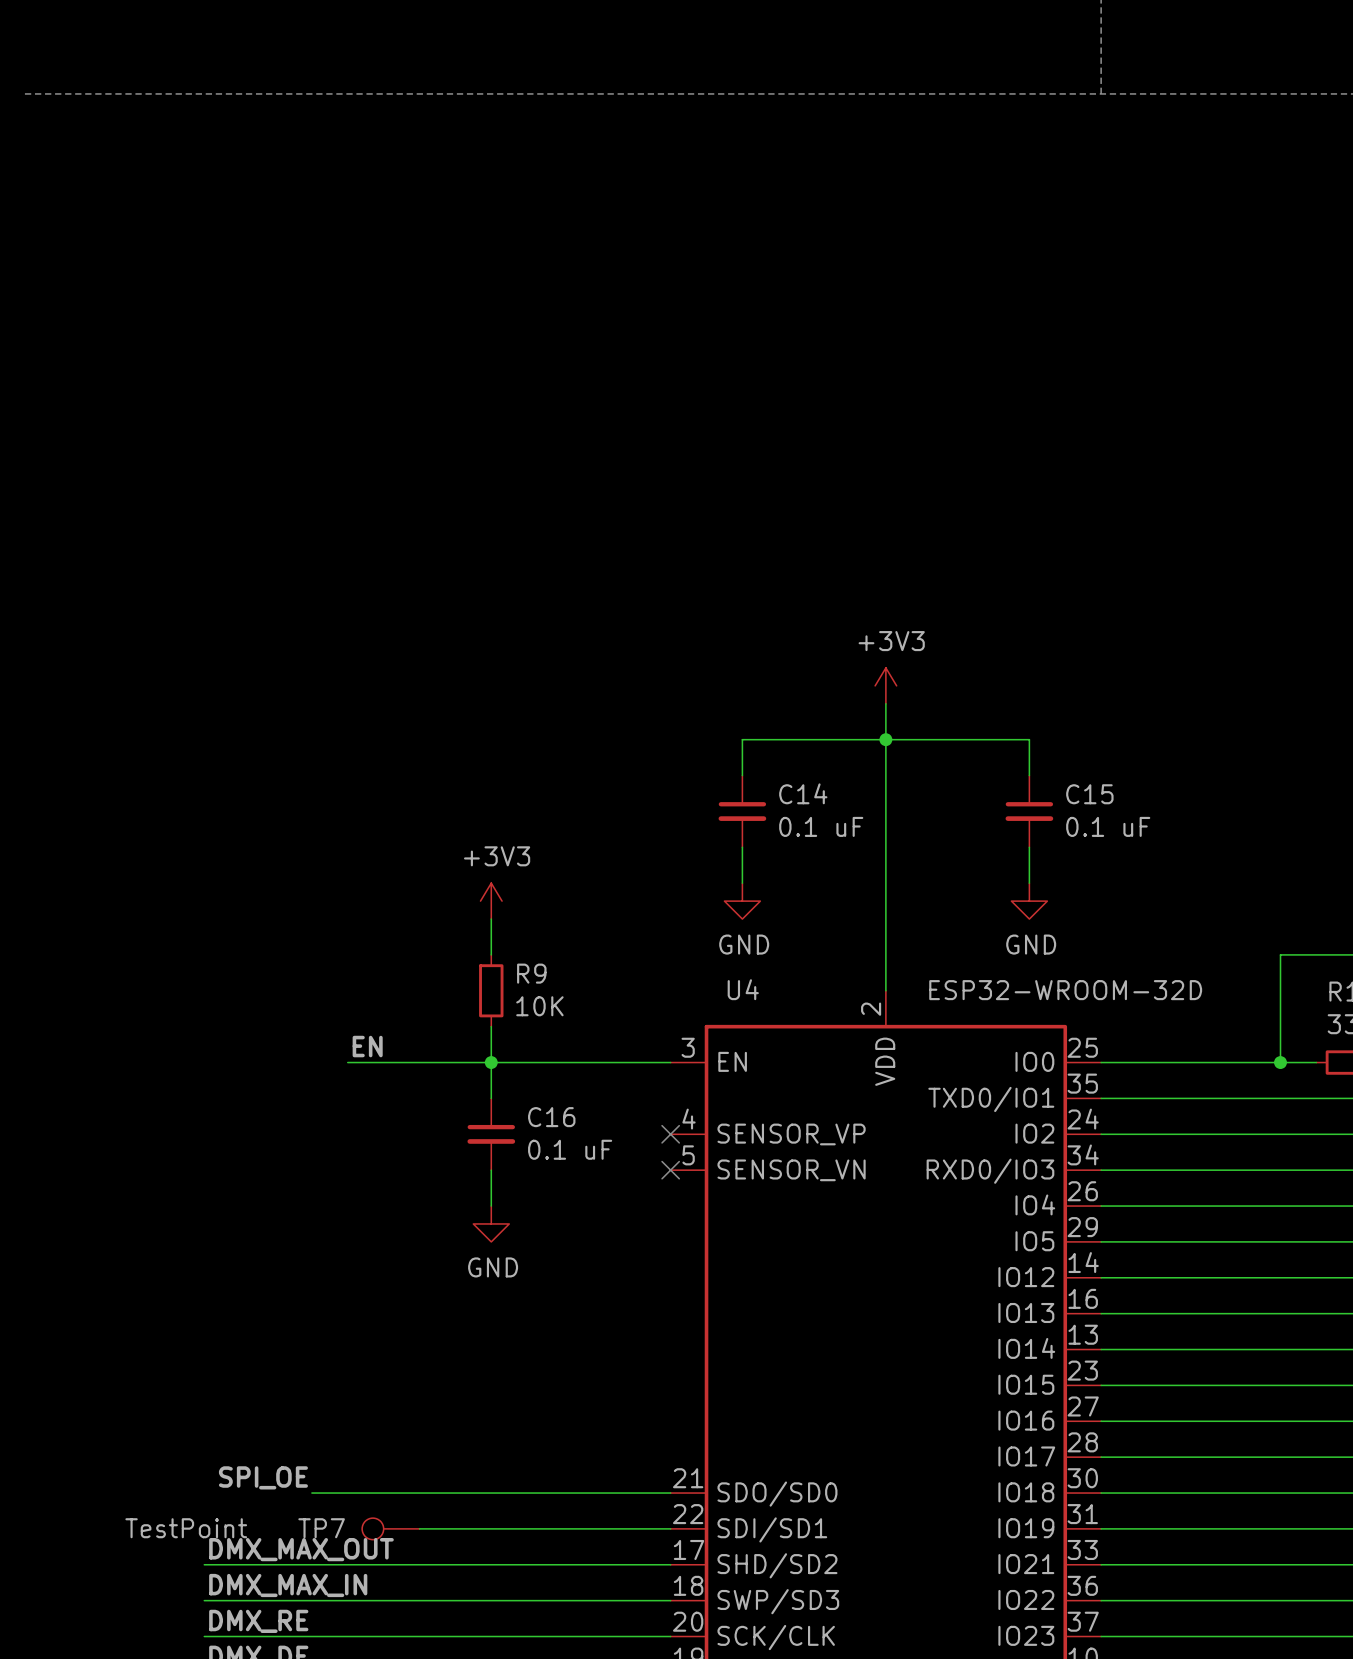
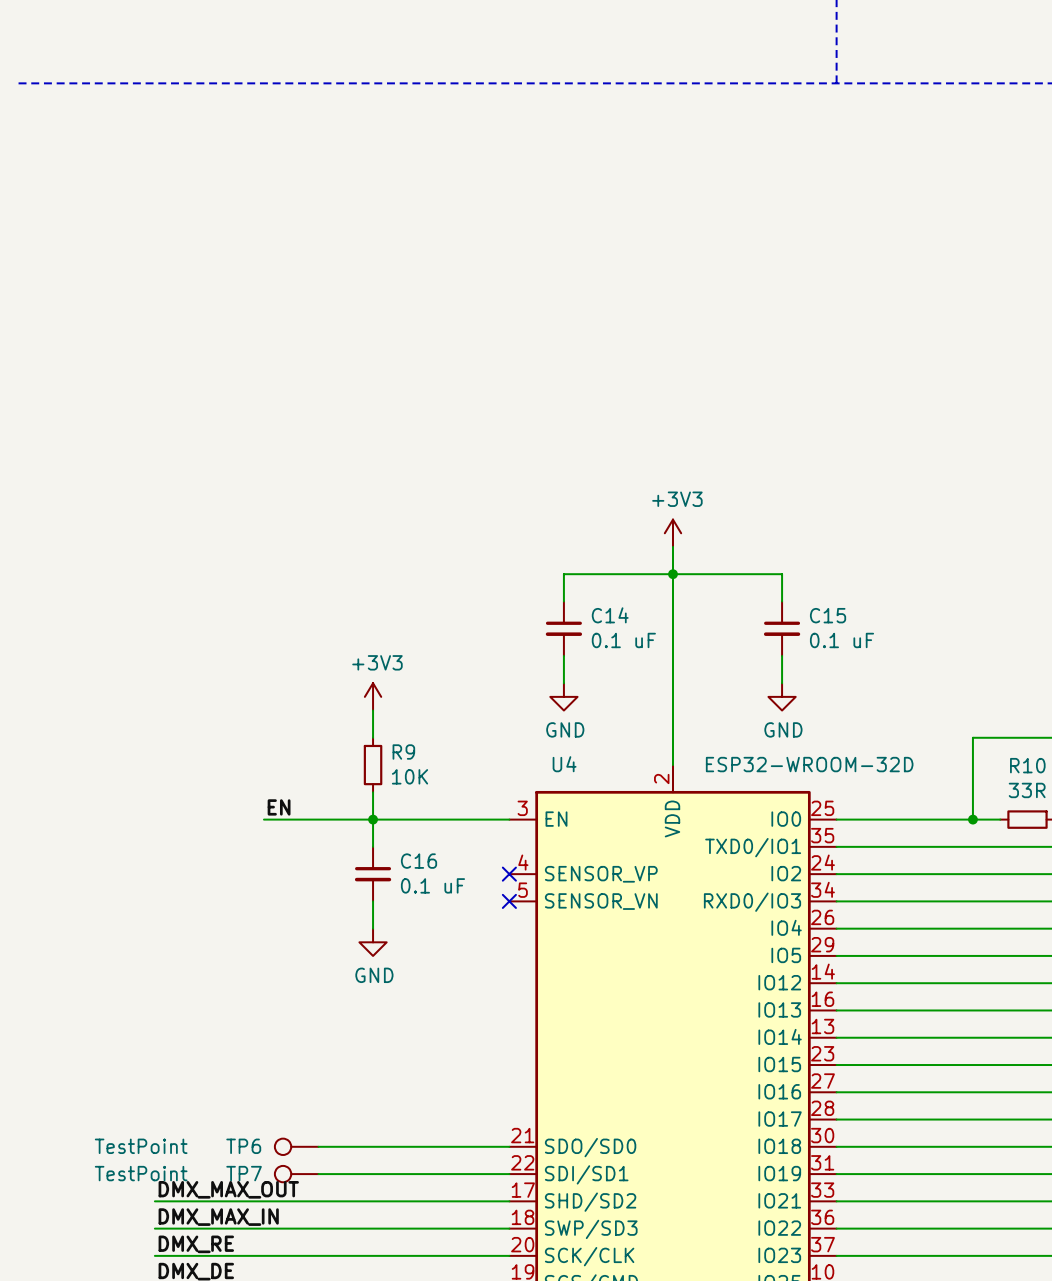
label: SPI_OE (263, 1477) -> none
wire: (311, 1493) (419, 1493) -> none
TP6: none -> TestPoint (296, 1146)

